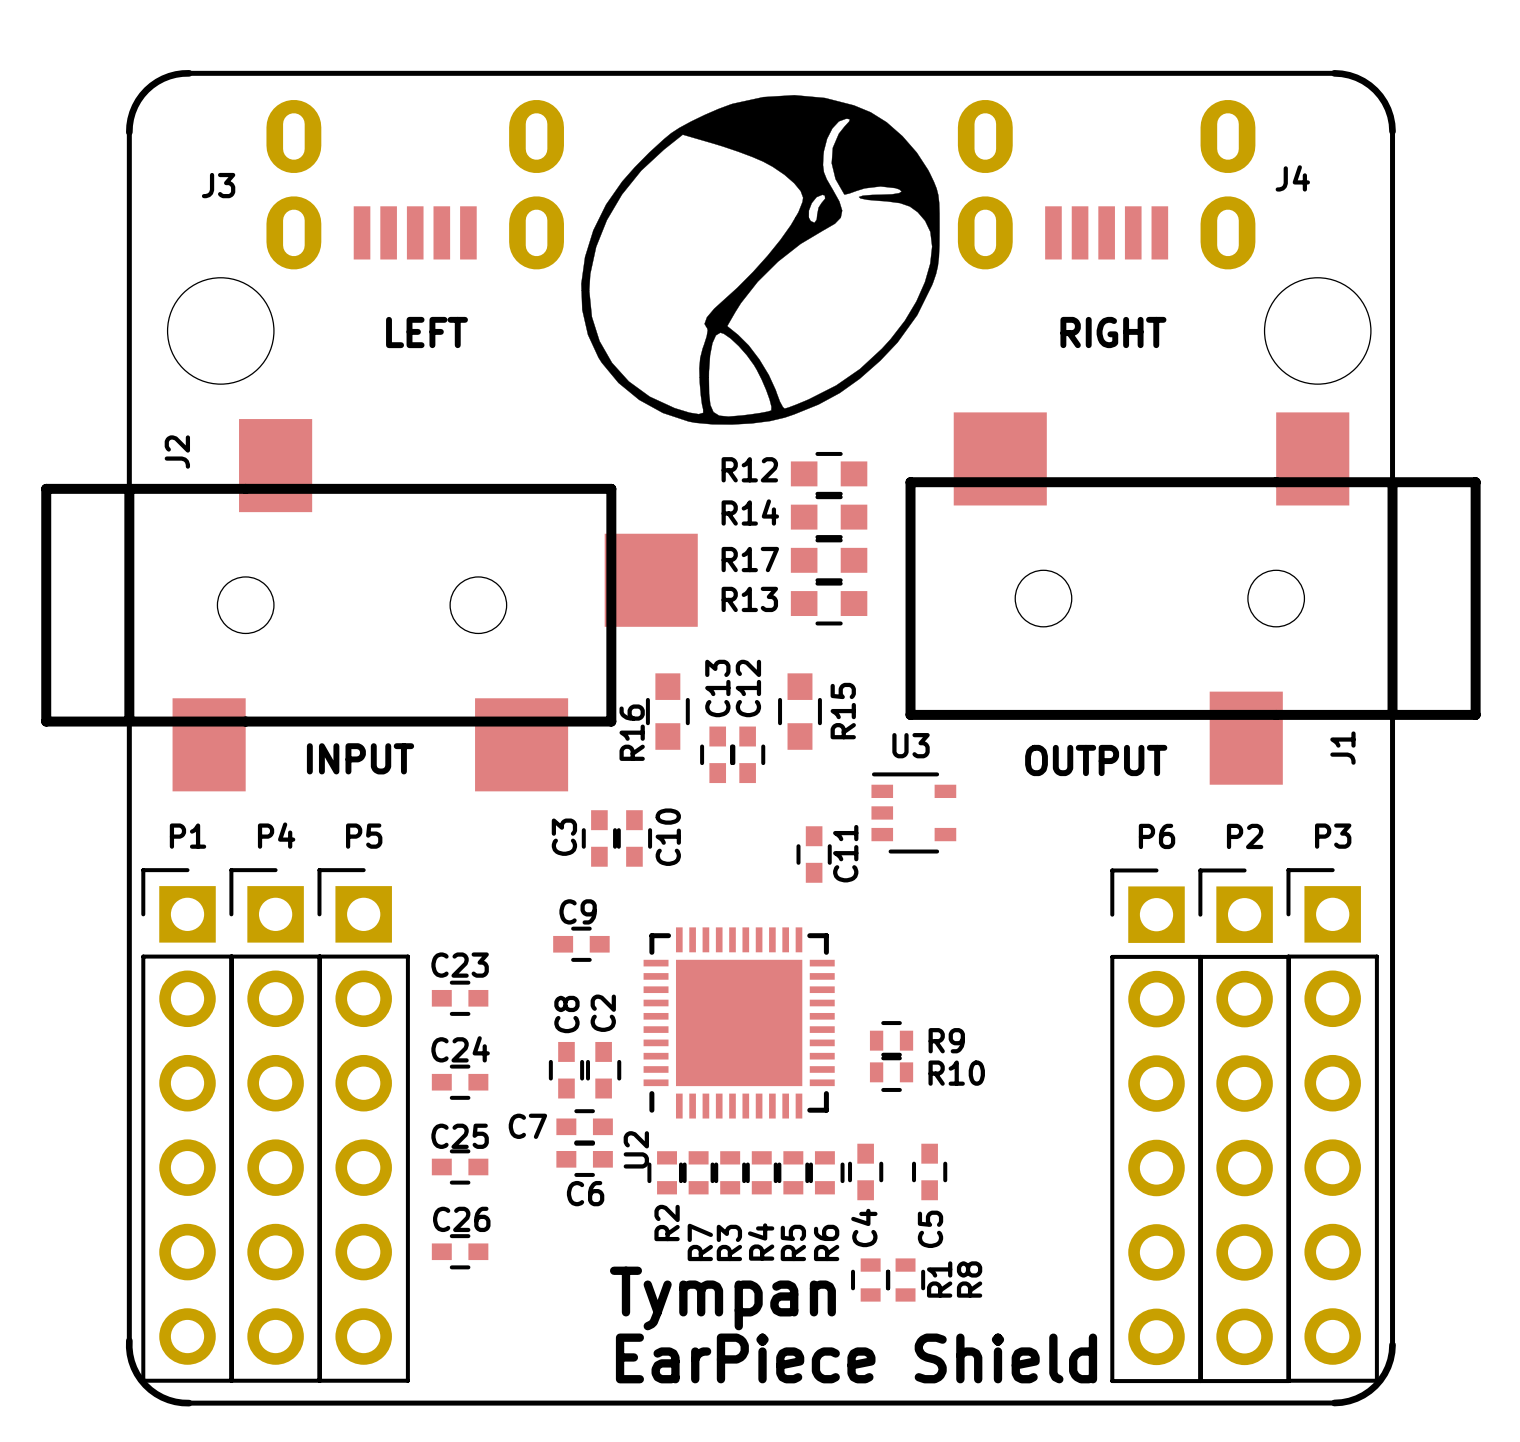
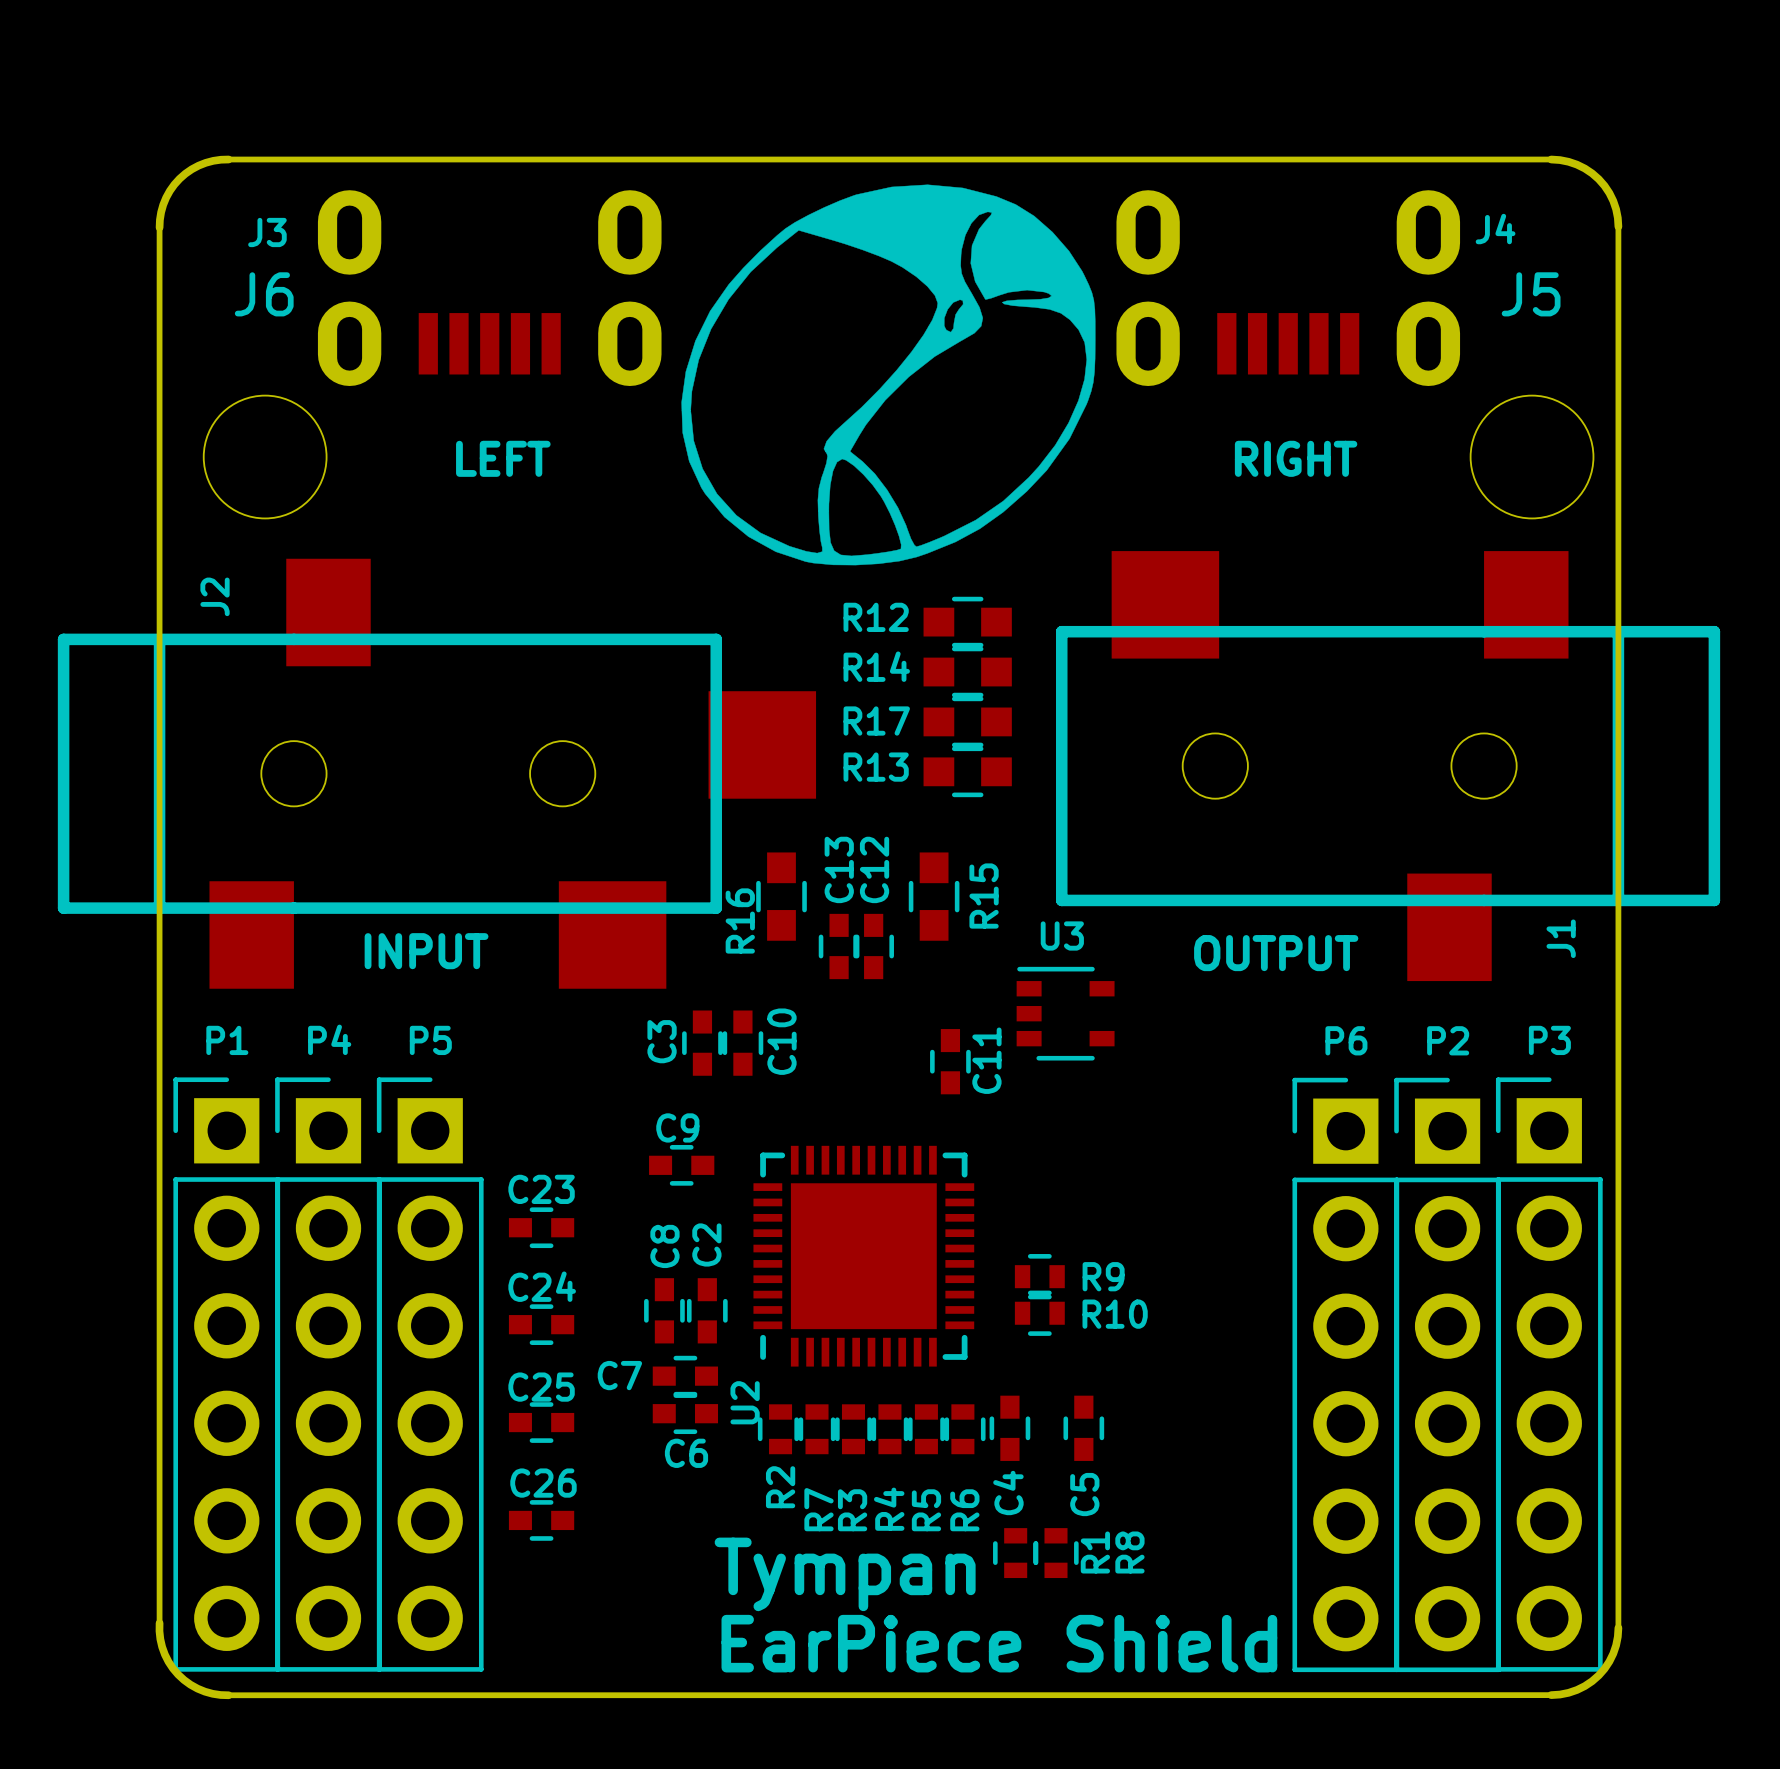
J4 name position: J4 (1292, 178) -> J4 (1495, 229)
J3 name position: J3 (218, 185) -> J3 (267, 232)
J6 name: none -> J6 (264, 294)
J5 name: none -> J5 (1531, 294)

